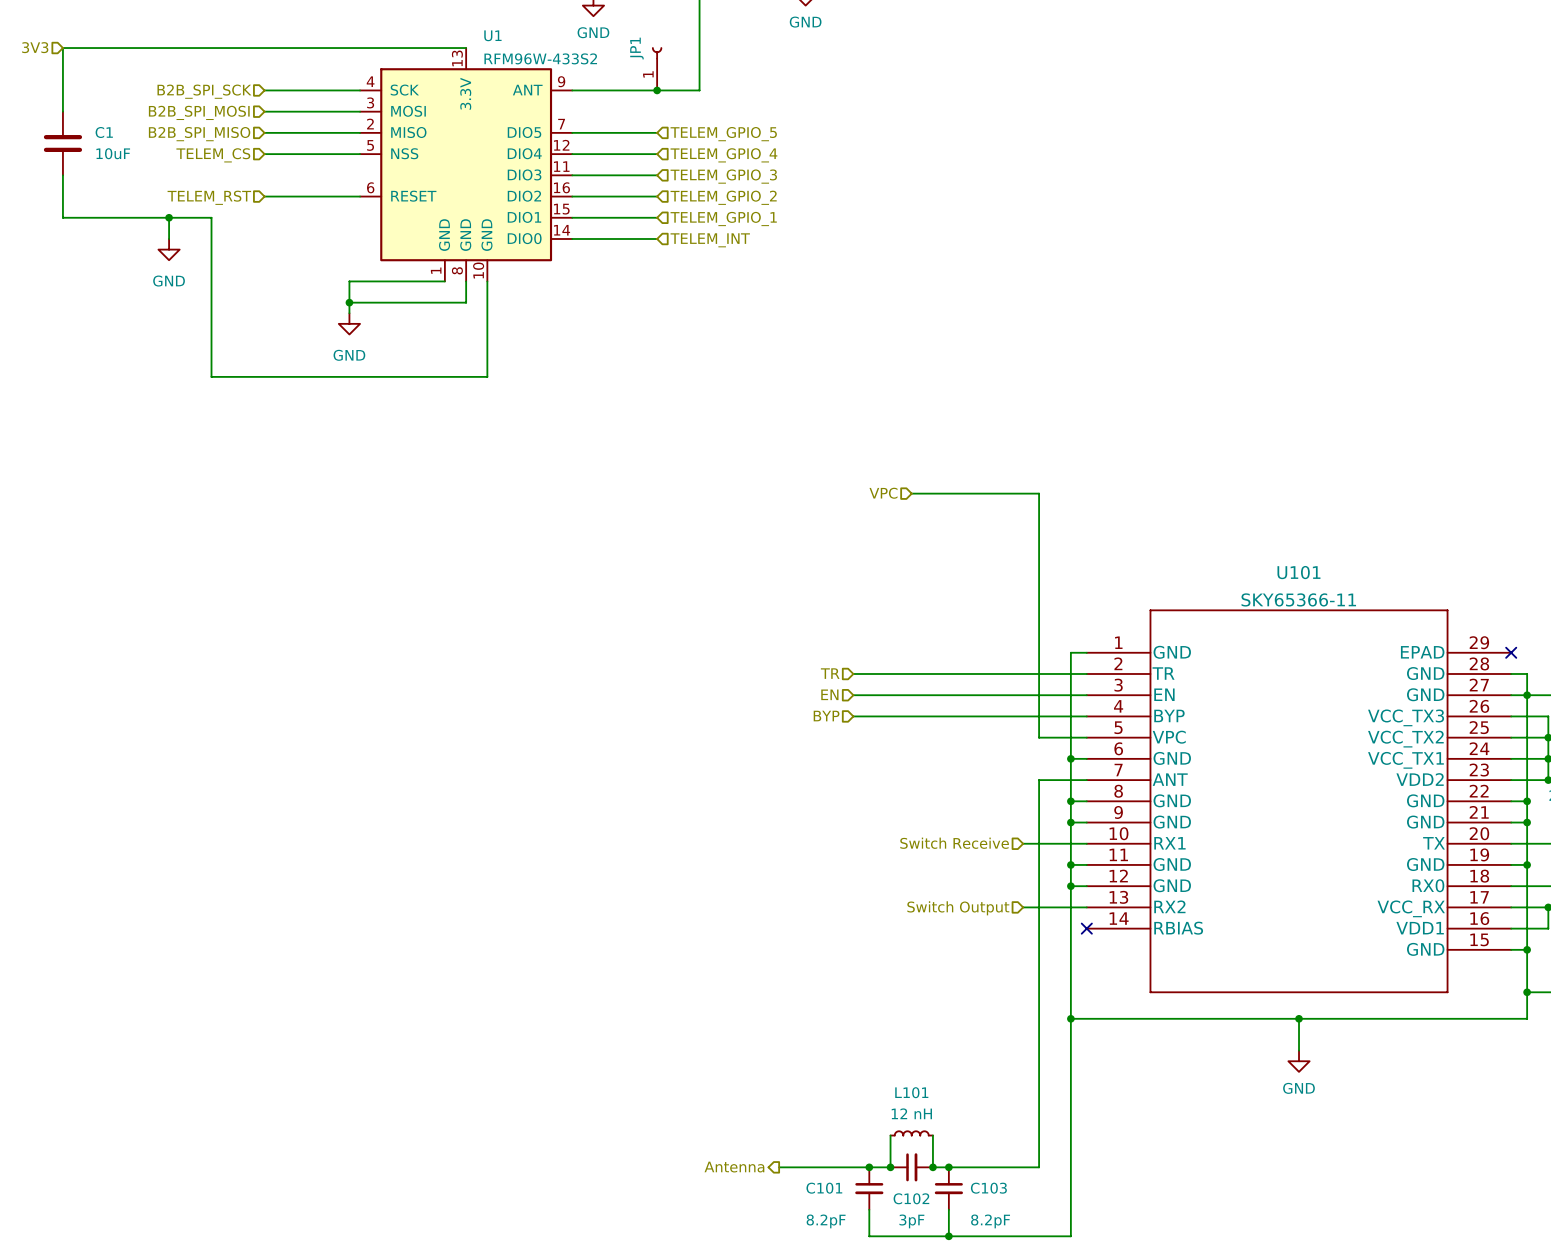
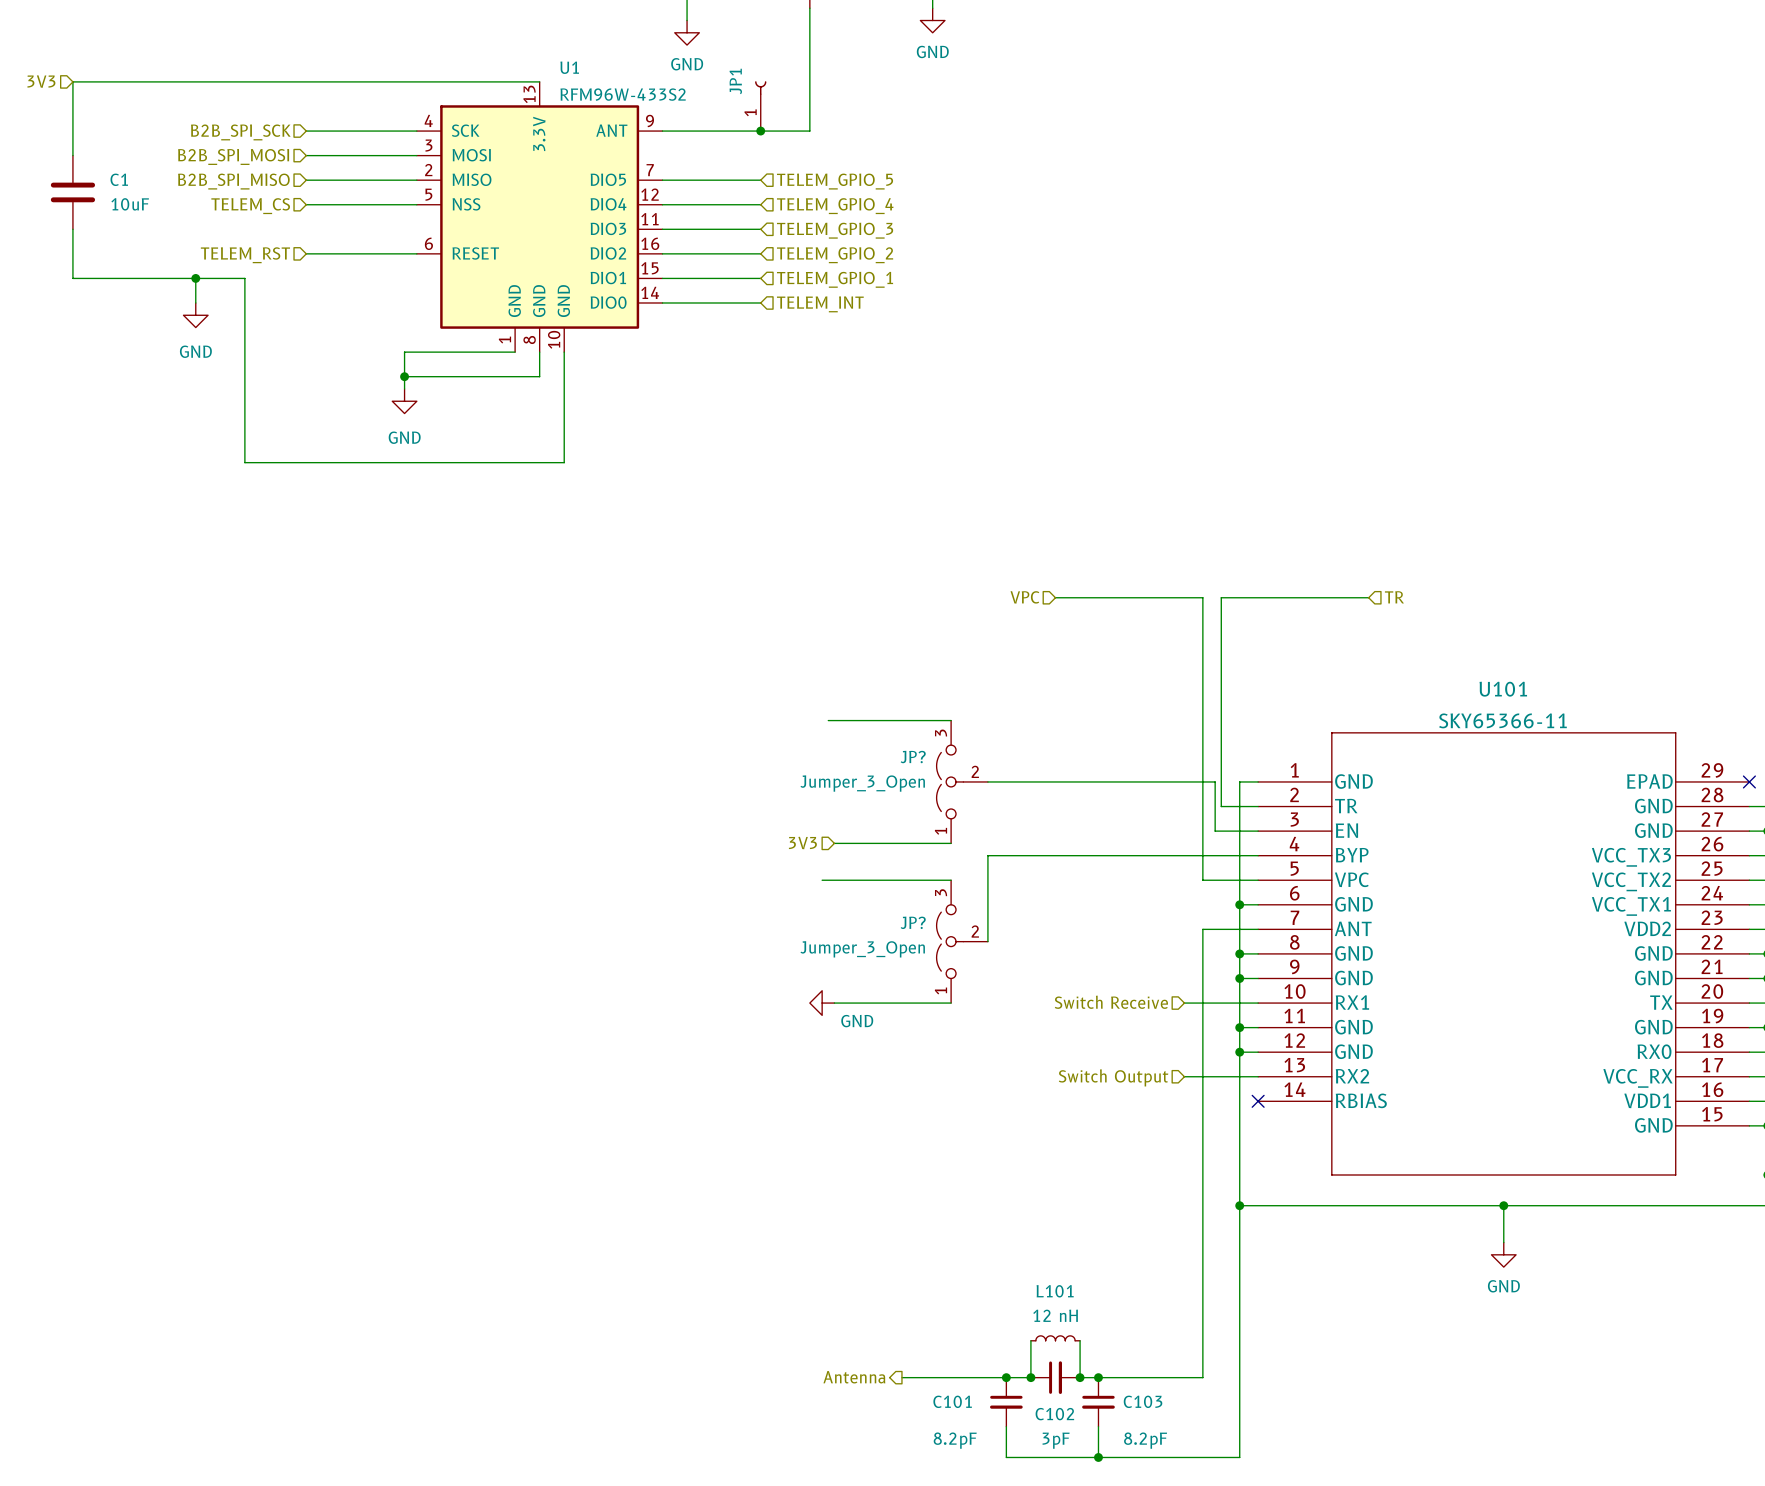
hierarchical label: none -> TR (1394, 597)
wire: none -> (828, 720) (951, 720)
JP?: none -> Jumper_3_Open (962, 781)
hierarchical label: TR (830, 673) -> none
wire: (853, 673) (1054, 673) -> (1368, 597) (1221, 597) (1221, 806)
hierarchical label: EN (829, 694) -> none
wire: (853, 695) (1049, 695) -> (987, 781) (1215, 781) (1215, 831)
hierarchical label: none -> 3V3 (802, 843)
wire: none -> (834, 843) (951, 843)
hierarchical label: BYP (826, 716) -> none
wire: none -> (987, 855) (987, 941)
wire: none -> (822, 880) (951, 880)
JP?: none -> Jumper_3_Open (962, 941)
power symbol: none -> GND (822, 1003)
wire: none -> (834, 1003) (951, 1003)

